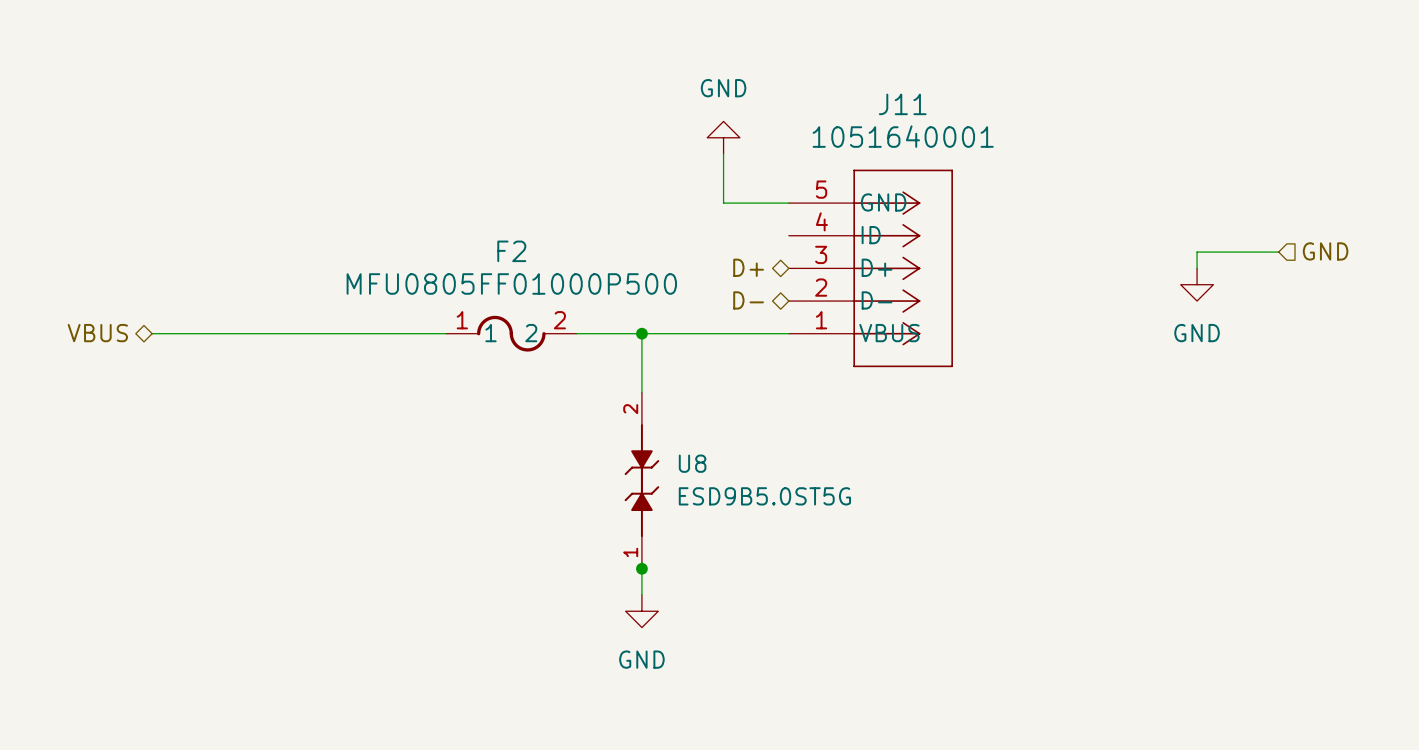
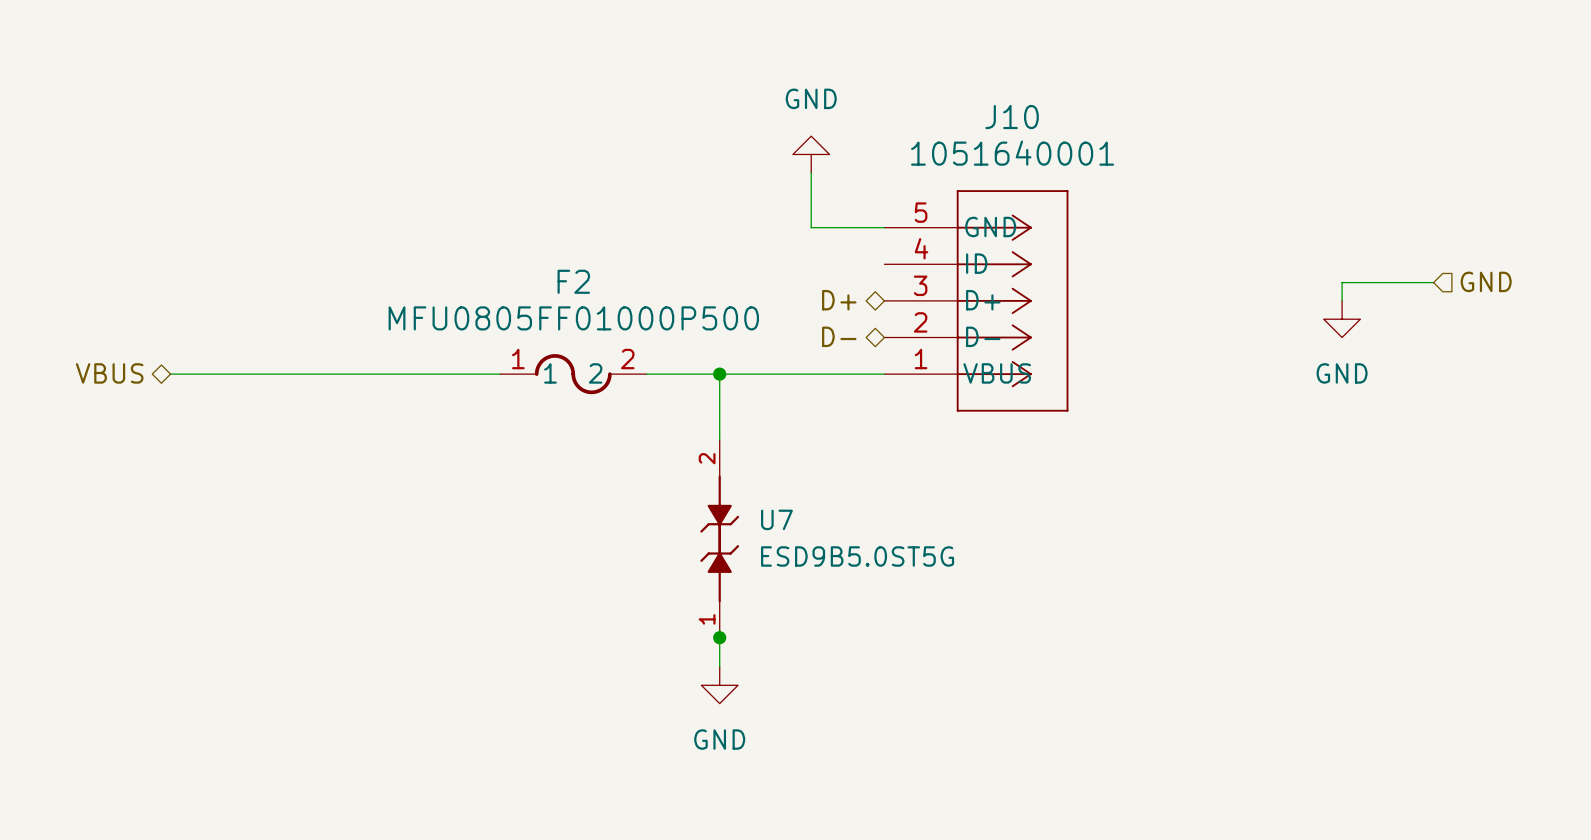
J11 name: J11 (902, 104) -> J10 (1012, 117)
U8 name: U8 (692, 463) -> U7 (776, 519)

